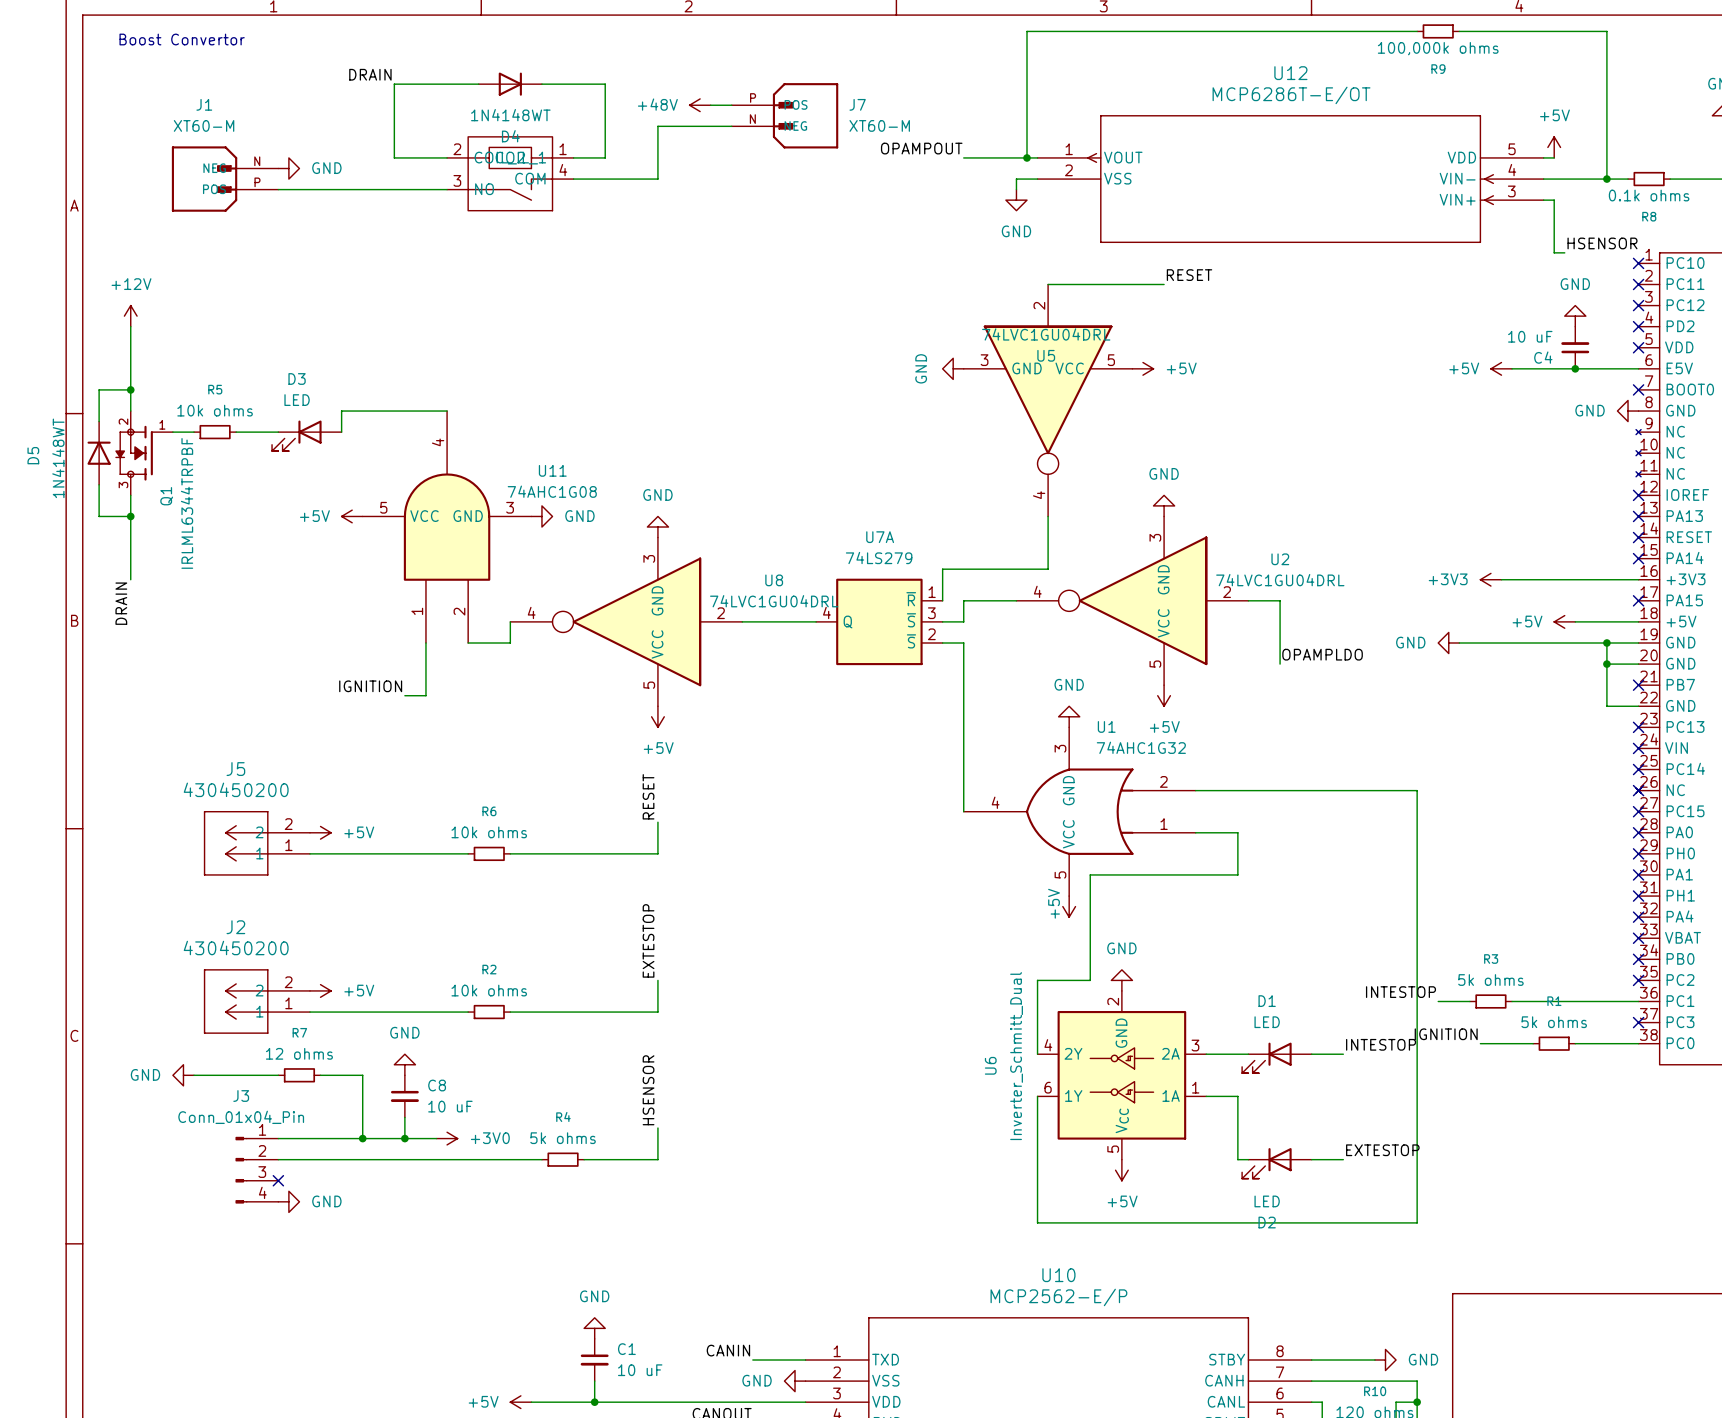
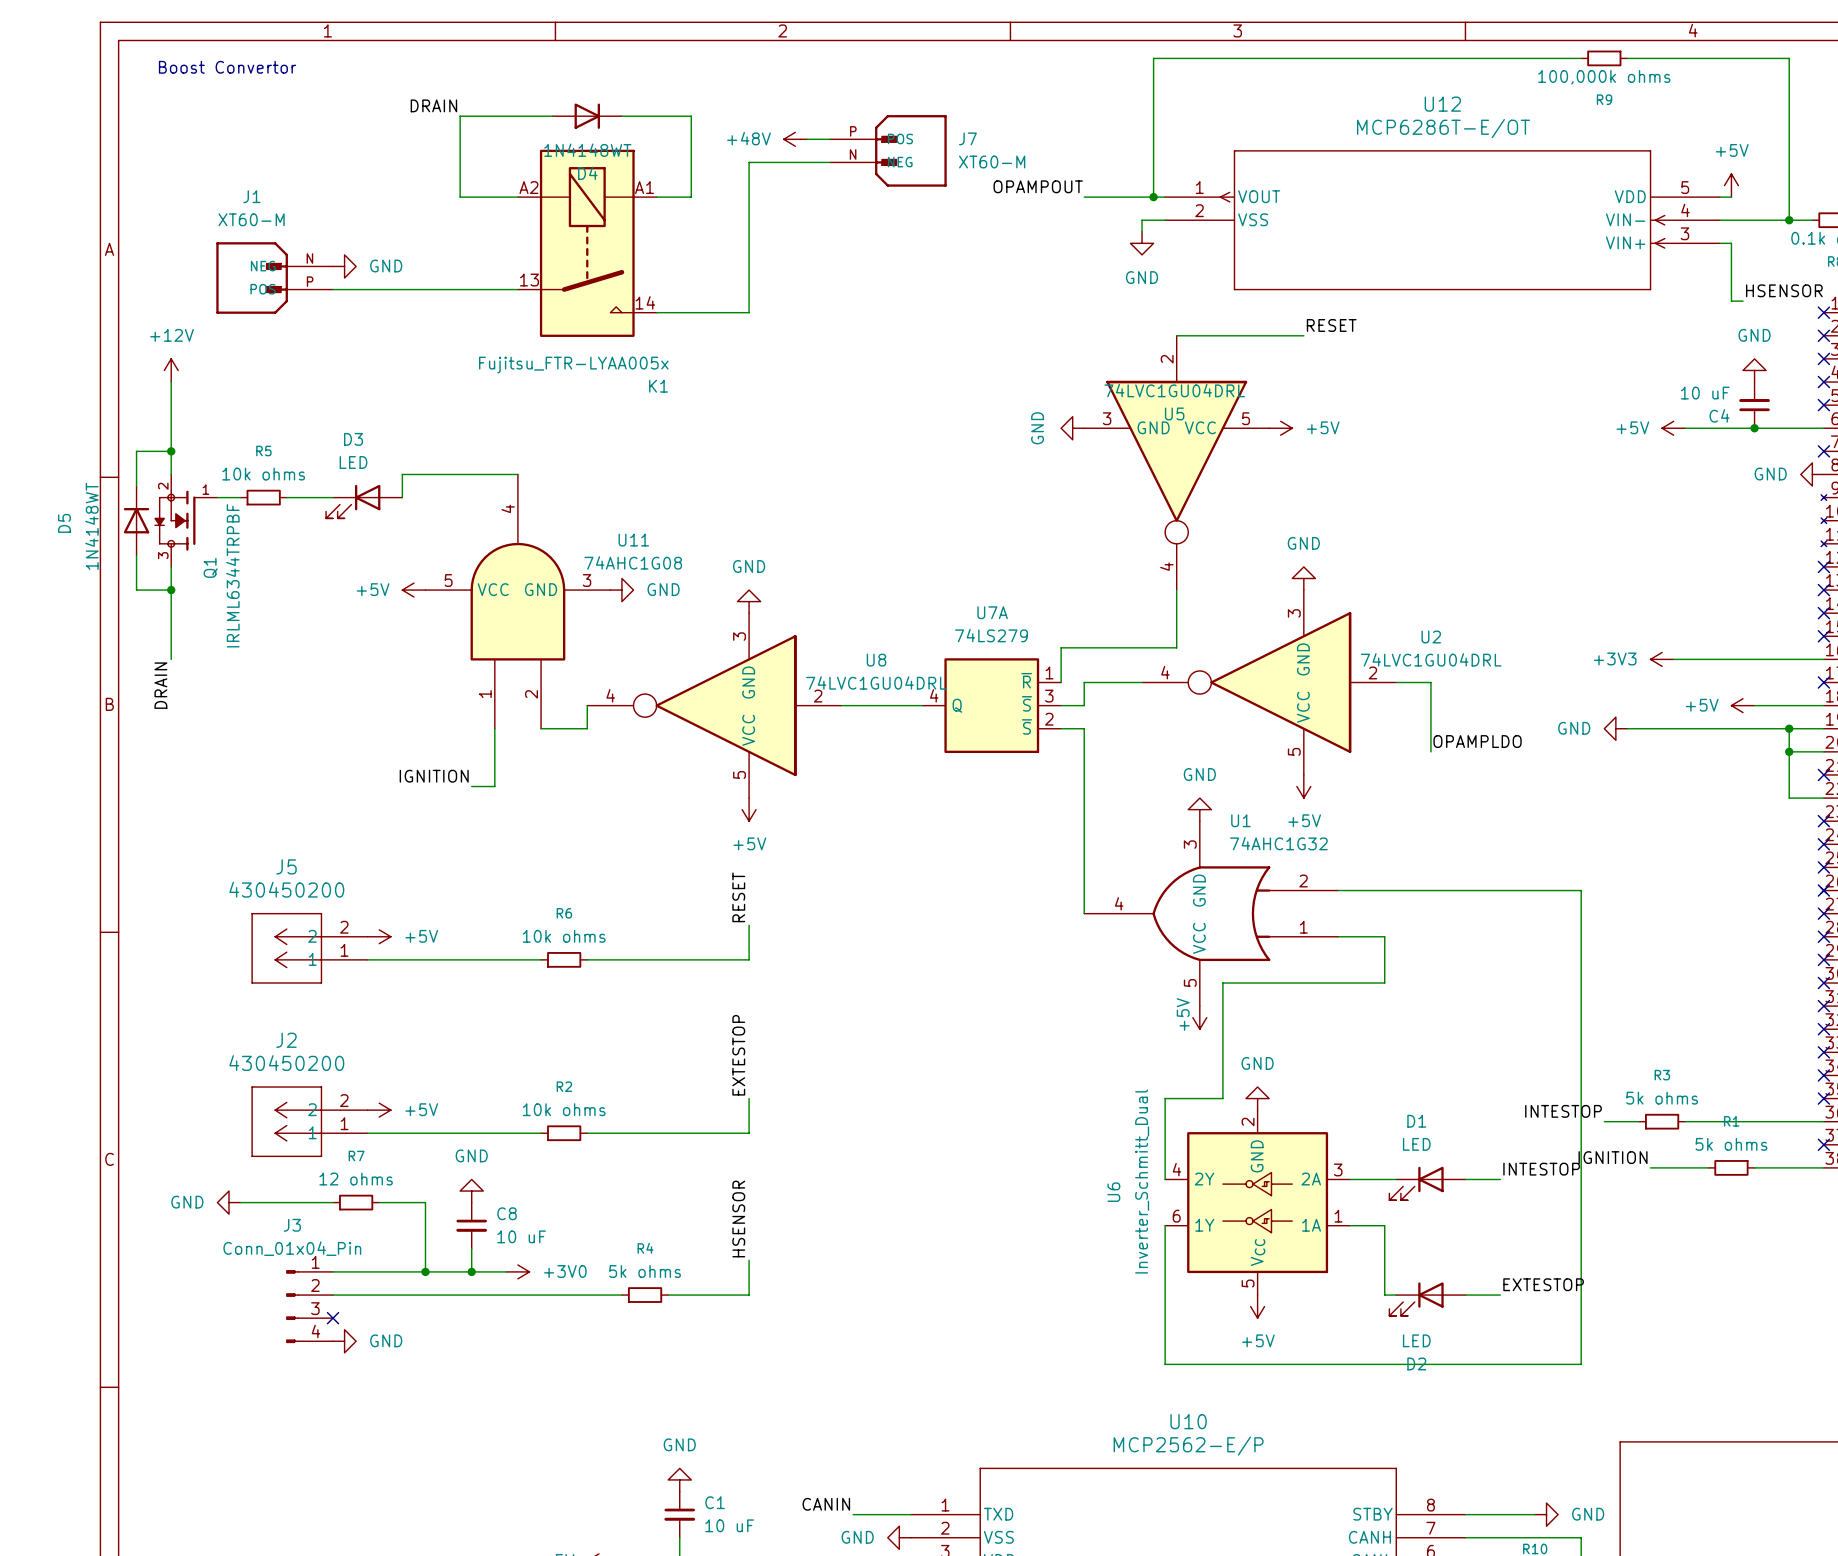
power symbol position: GND (288, 168) -> GND (344, 266)
part: (510, 173) -> none
J1 position: (225, 179) -> (274, 278)
wire: (573, 179) (657, 179) -> (656, 312) (749, 312) (749, 220)
wire: (278, 189) (447, 189) -> (333, 289) (517, 289)
K1: none -> Fujitsu_FTR-LYAA005x (587, 243)

